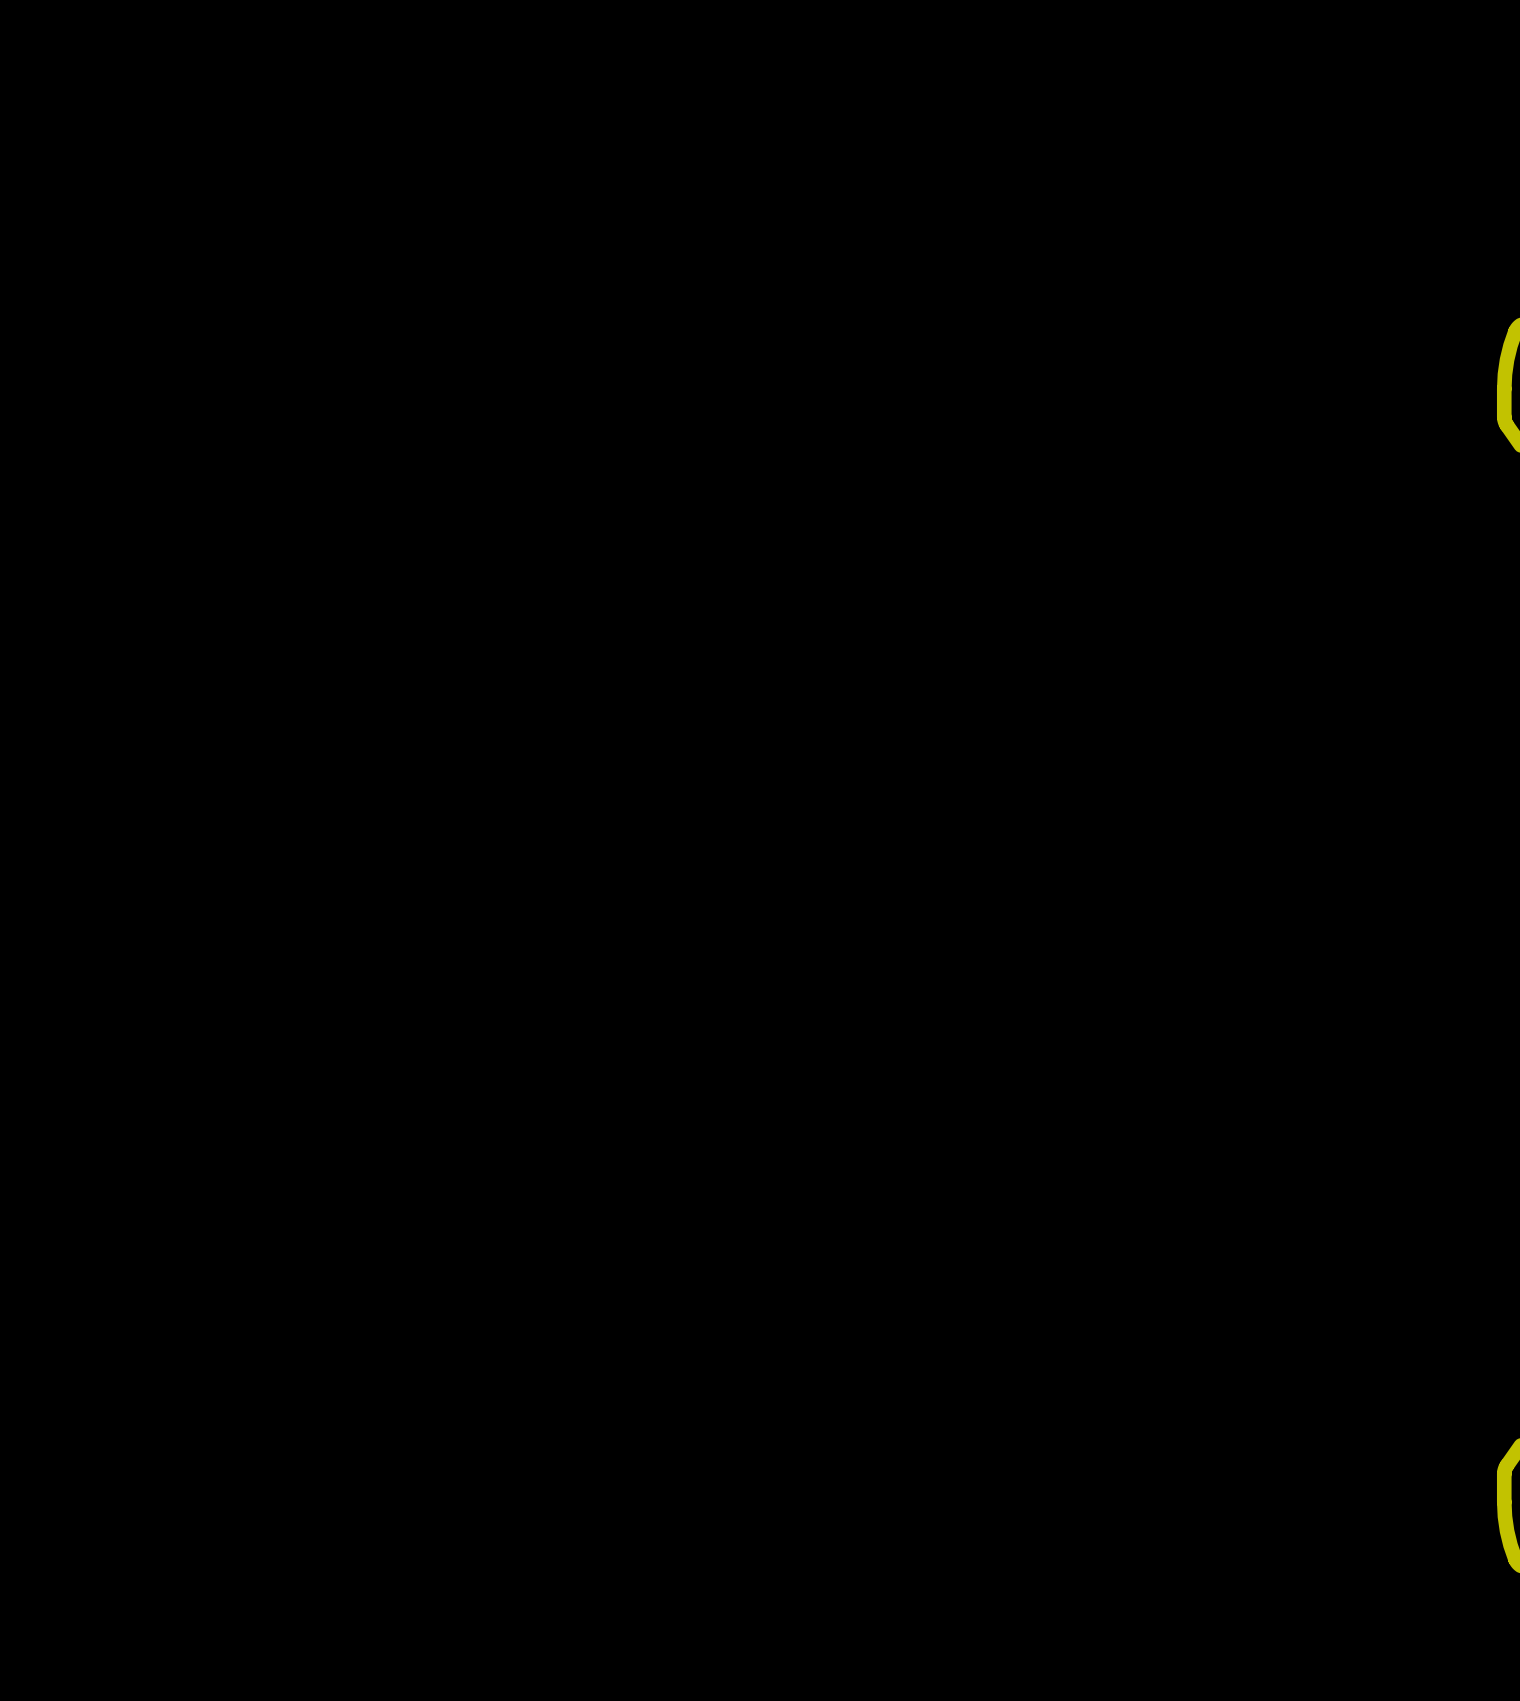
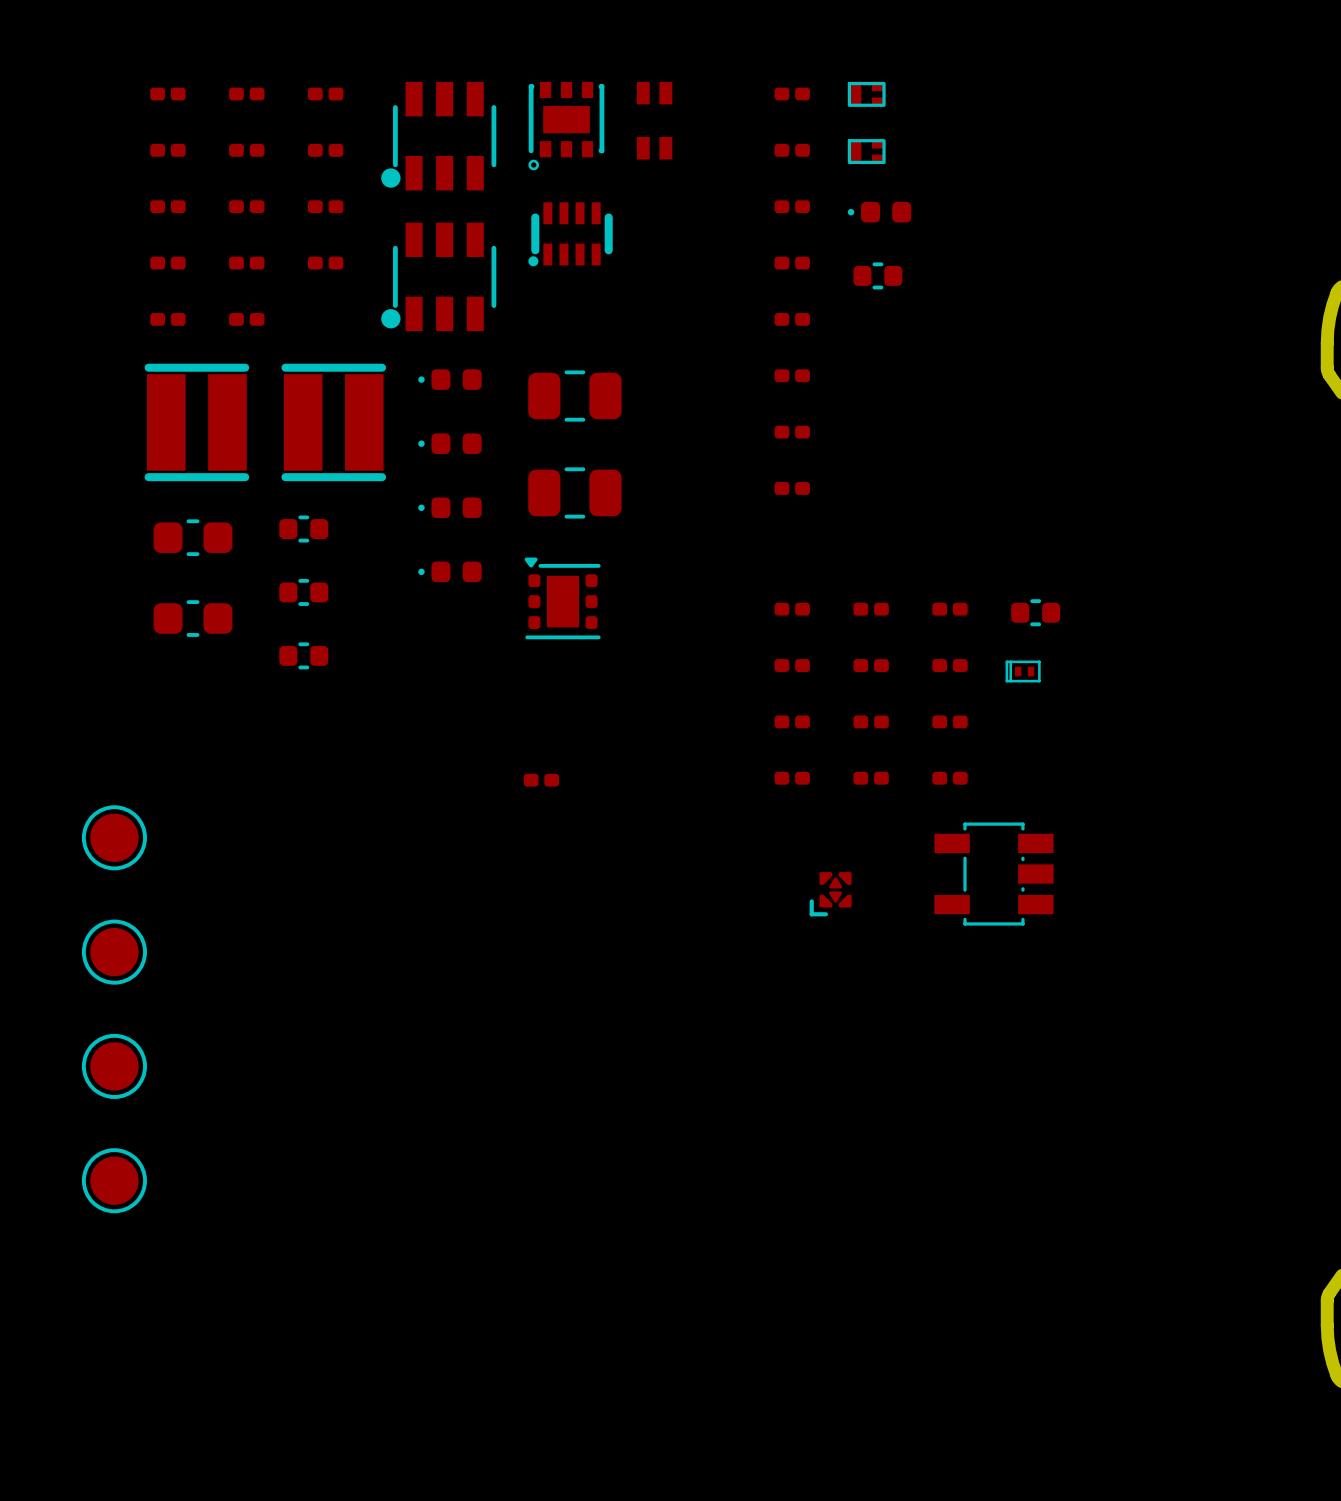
part: none -> (654, 93)
part: none -> (167, 94)
part: none -> (246, 94)
part: none -> (325, 94)
part: none -> (792, 94)
part: none -> (866, 94)
part: none -> (566, 126)
part: none -> (438, 136)
part: none -> (654, 148)
part: none -> (167, 150)
part: none -> (246, 150)
part: none -> (325, 150)
part: none -> (792, 150)
part: none -> (866, 151)
part: none -> (167, 206)
part: none -> (246, 206)
part: none -> (325, 206)
part: none -> (792, 206)
part: none -> (879, 212)
part: none -> (570, 234)
part: none -> (167, 263)
part: none -> (246, 263)
part: none -> (325, 263)
part: none -> (792, 263)
part: none -> (877, 275)
part: none -> (438, 276)
part: none -> (167, 319)
part: none -> (246, 319)
part: none -> (792, 319)
part: none -> (792, 375)
part: none -> (449, 379)
part: none -> (574, 396)
part: none -> (196, 422)
part: none -> (333, 422)
part: none -> (792, 432)
part: none -> (449, 443)
part: none -> (792, 488)
part: none -> (574, 492)
part: none -> (449, 507)
part: none -> (303, 529)
part: none -> (193, 537)
part: none -> (449, 571)
part: none -> (303, 592)
part: none -> (562, 598)
part: none -> (792, 609)
part: none -> (871, 609)
part: none -> (950, 609)
part: none -> (1035, 612)
part: none -> (193, 618)
part: none -> (303, 655)
part: none -> (792, 665)
part: none -> (871, 665)
part: none -> (950, 665)
part: none -> (1023, 671)
part: none -> (792, 721)
part: none -> (871, 721)
part: none -> (950, 721)
part: none -> (792, 778)
part: none -> (871, 778)
part: none -> (950, 778)
part: none -> (541, 780)
part: none -> (114, 837)
part: none -> (993, 874)
part: none -> (830, 894)
part: none -> (114, 952)
part: none -> (114, 1066)
part: none -> (114, 1180)

